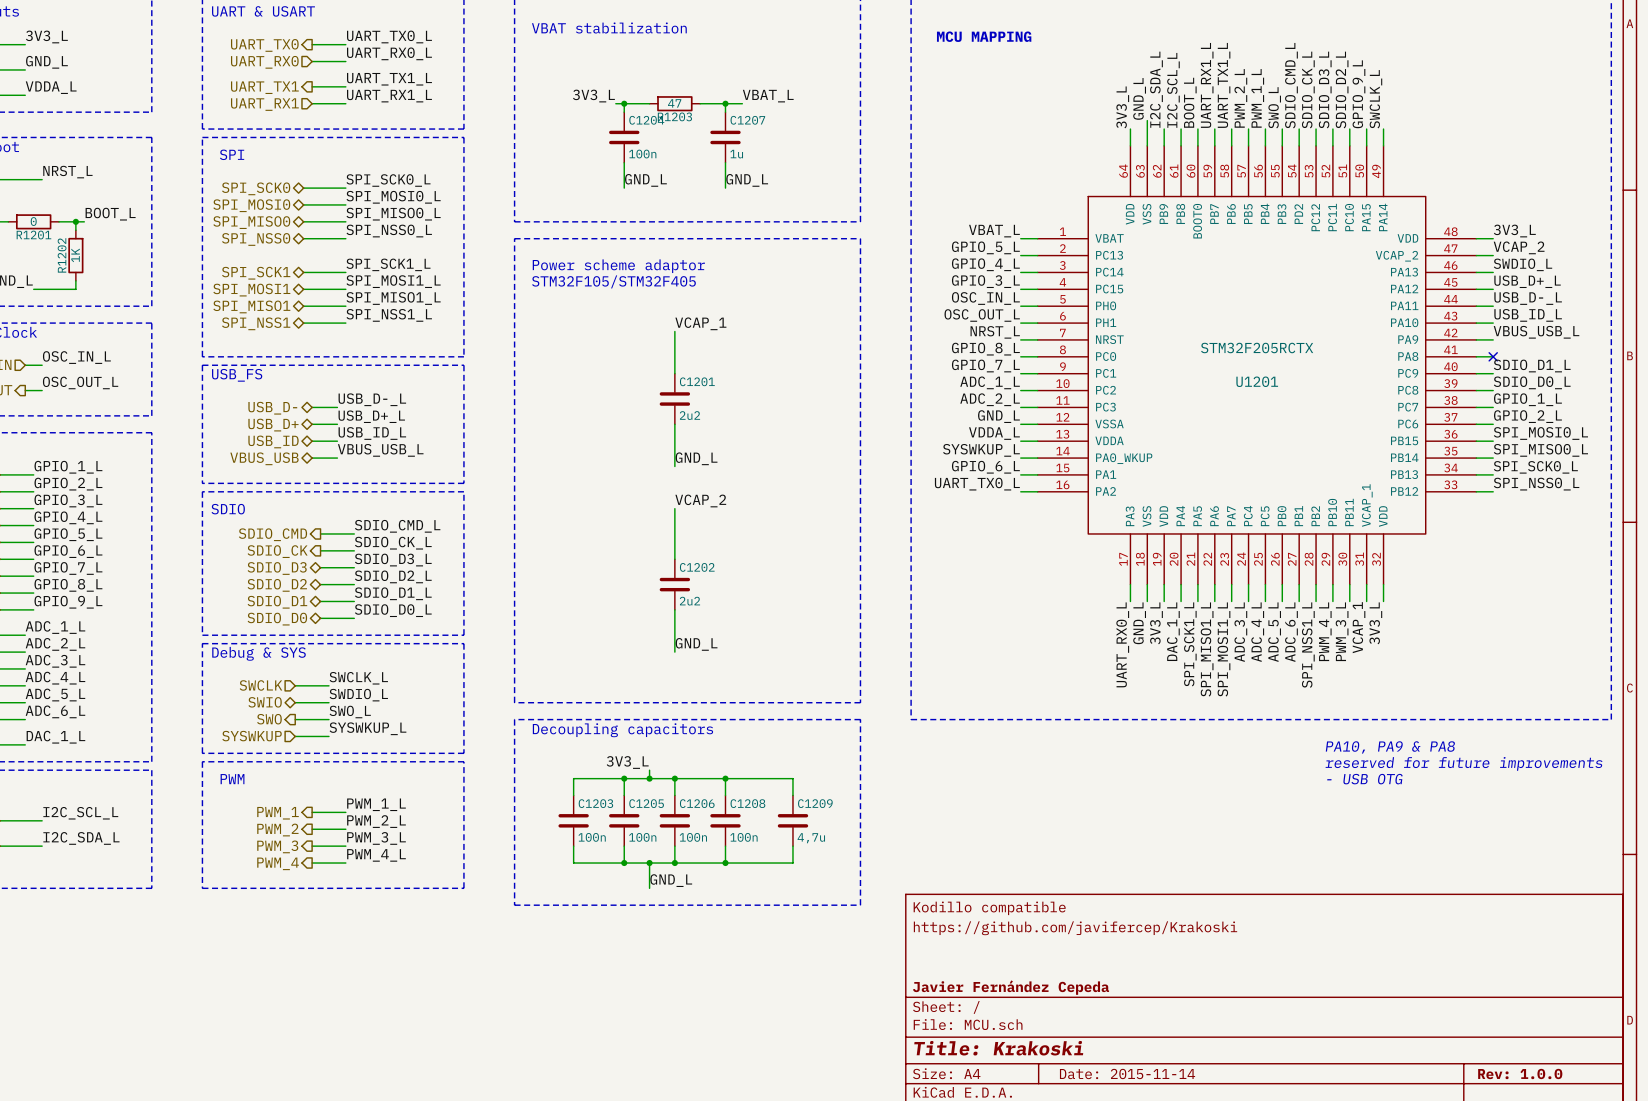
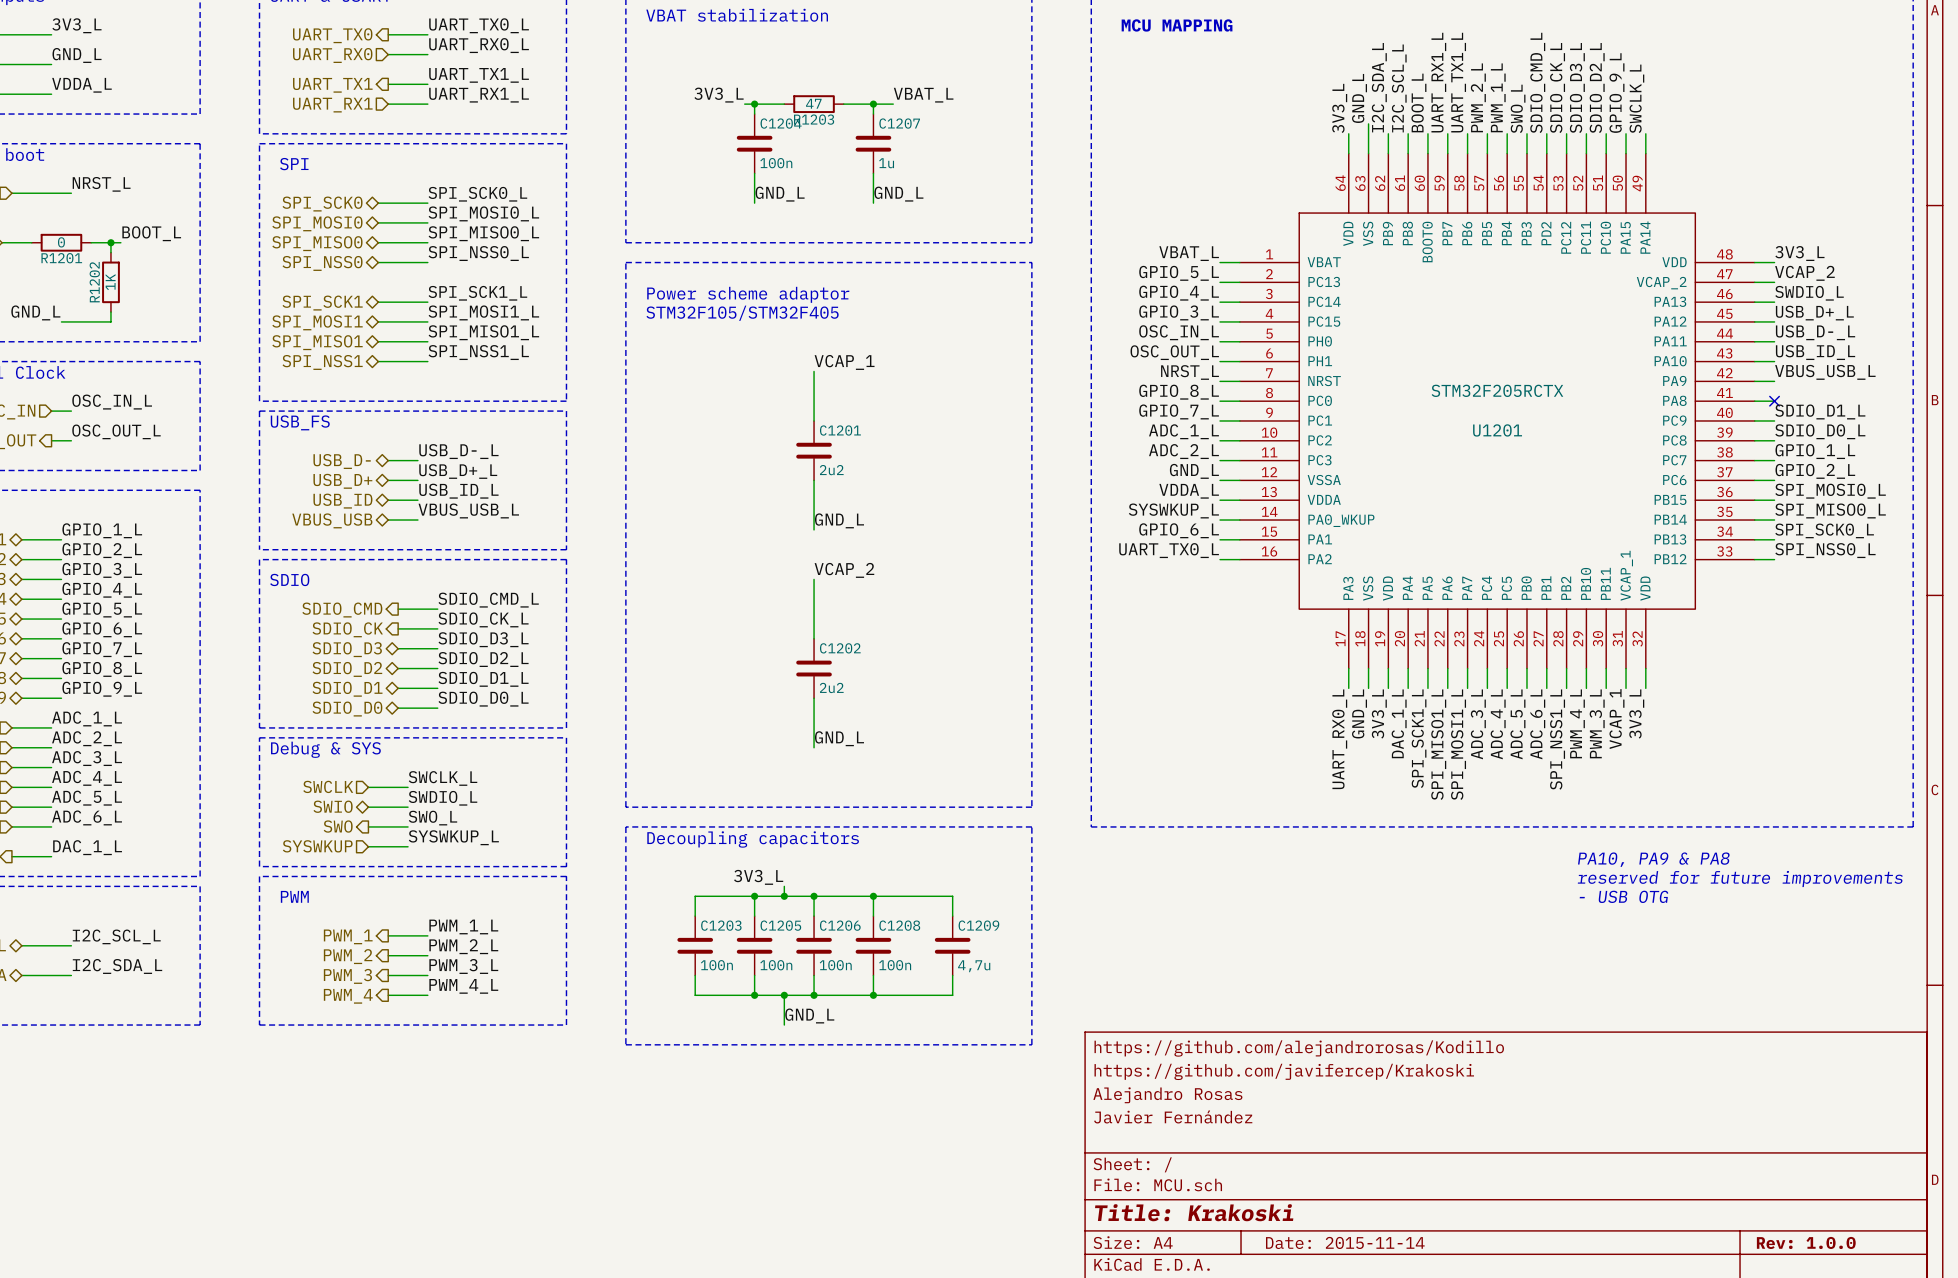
title block: Kodillo compatible (989, 908) -> https://github.com/alejandrorosas/Kodillo (1299, 1048)
title block: none -> Alejandro Rosas (1167, 1095)
title block: Javier Fernández Cepeda (1011, 987) -> Javier Fernández (1173, 1116)

